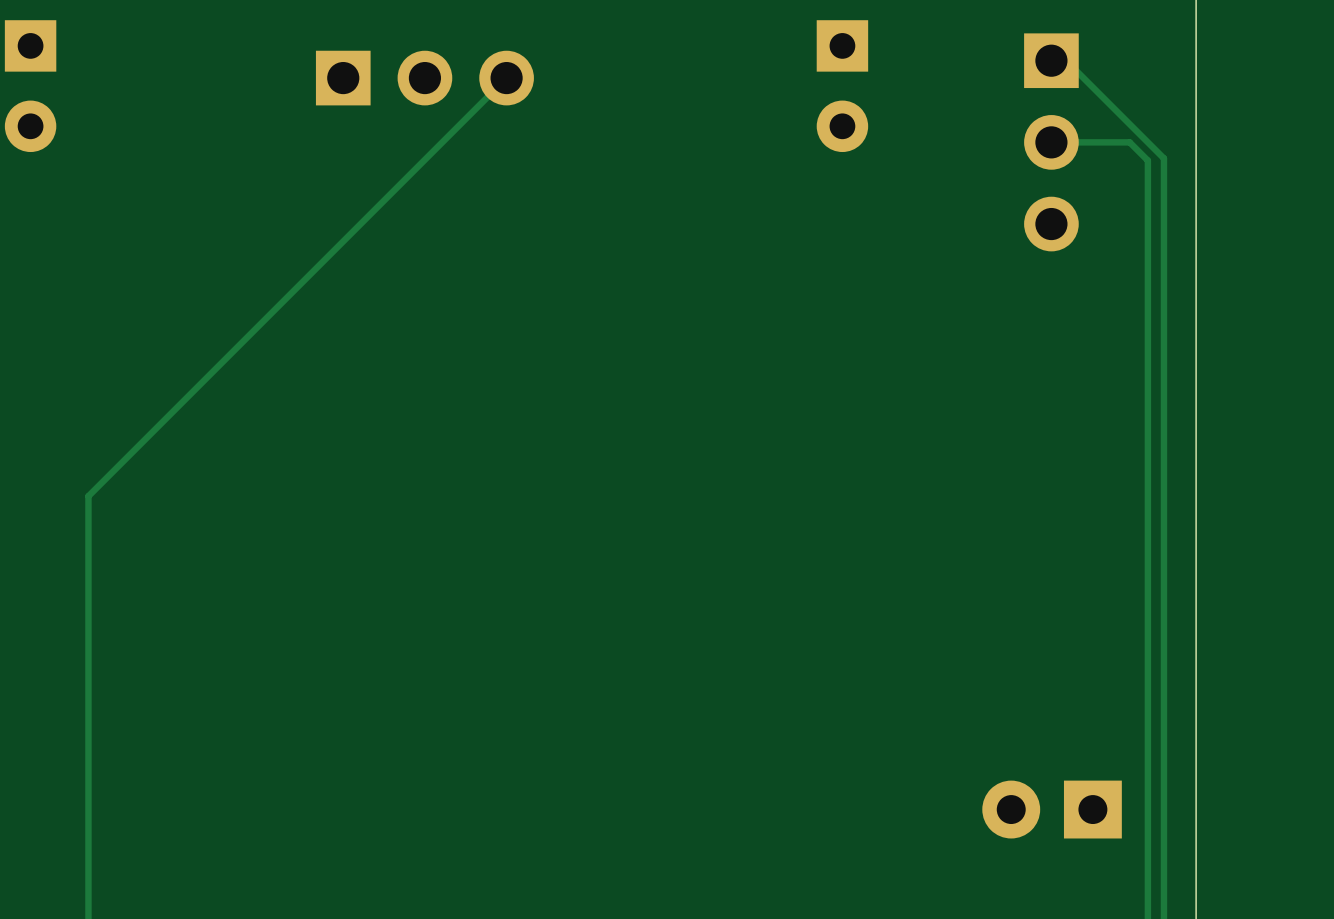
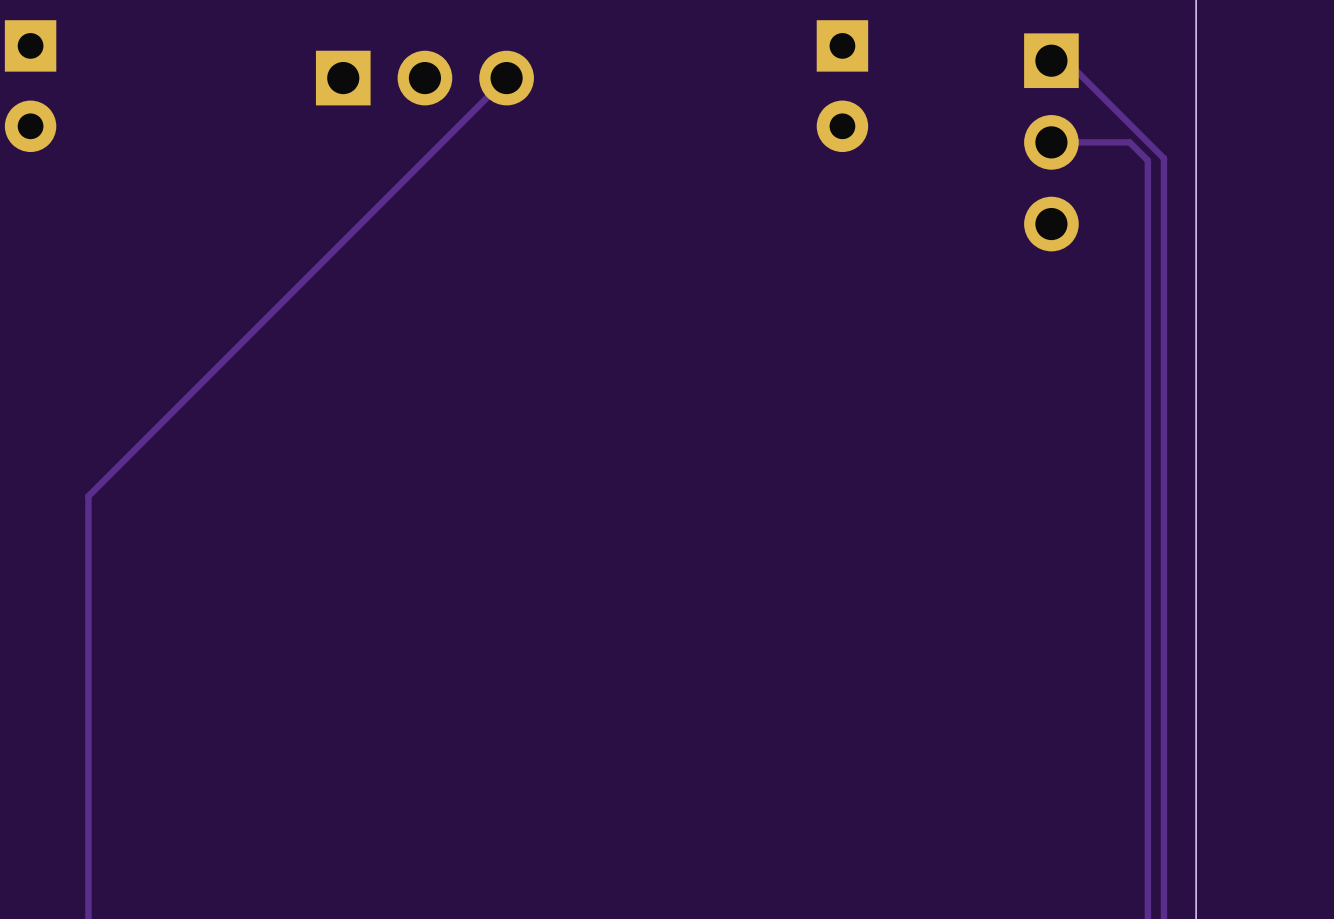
part: (1052, 809) -> none

